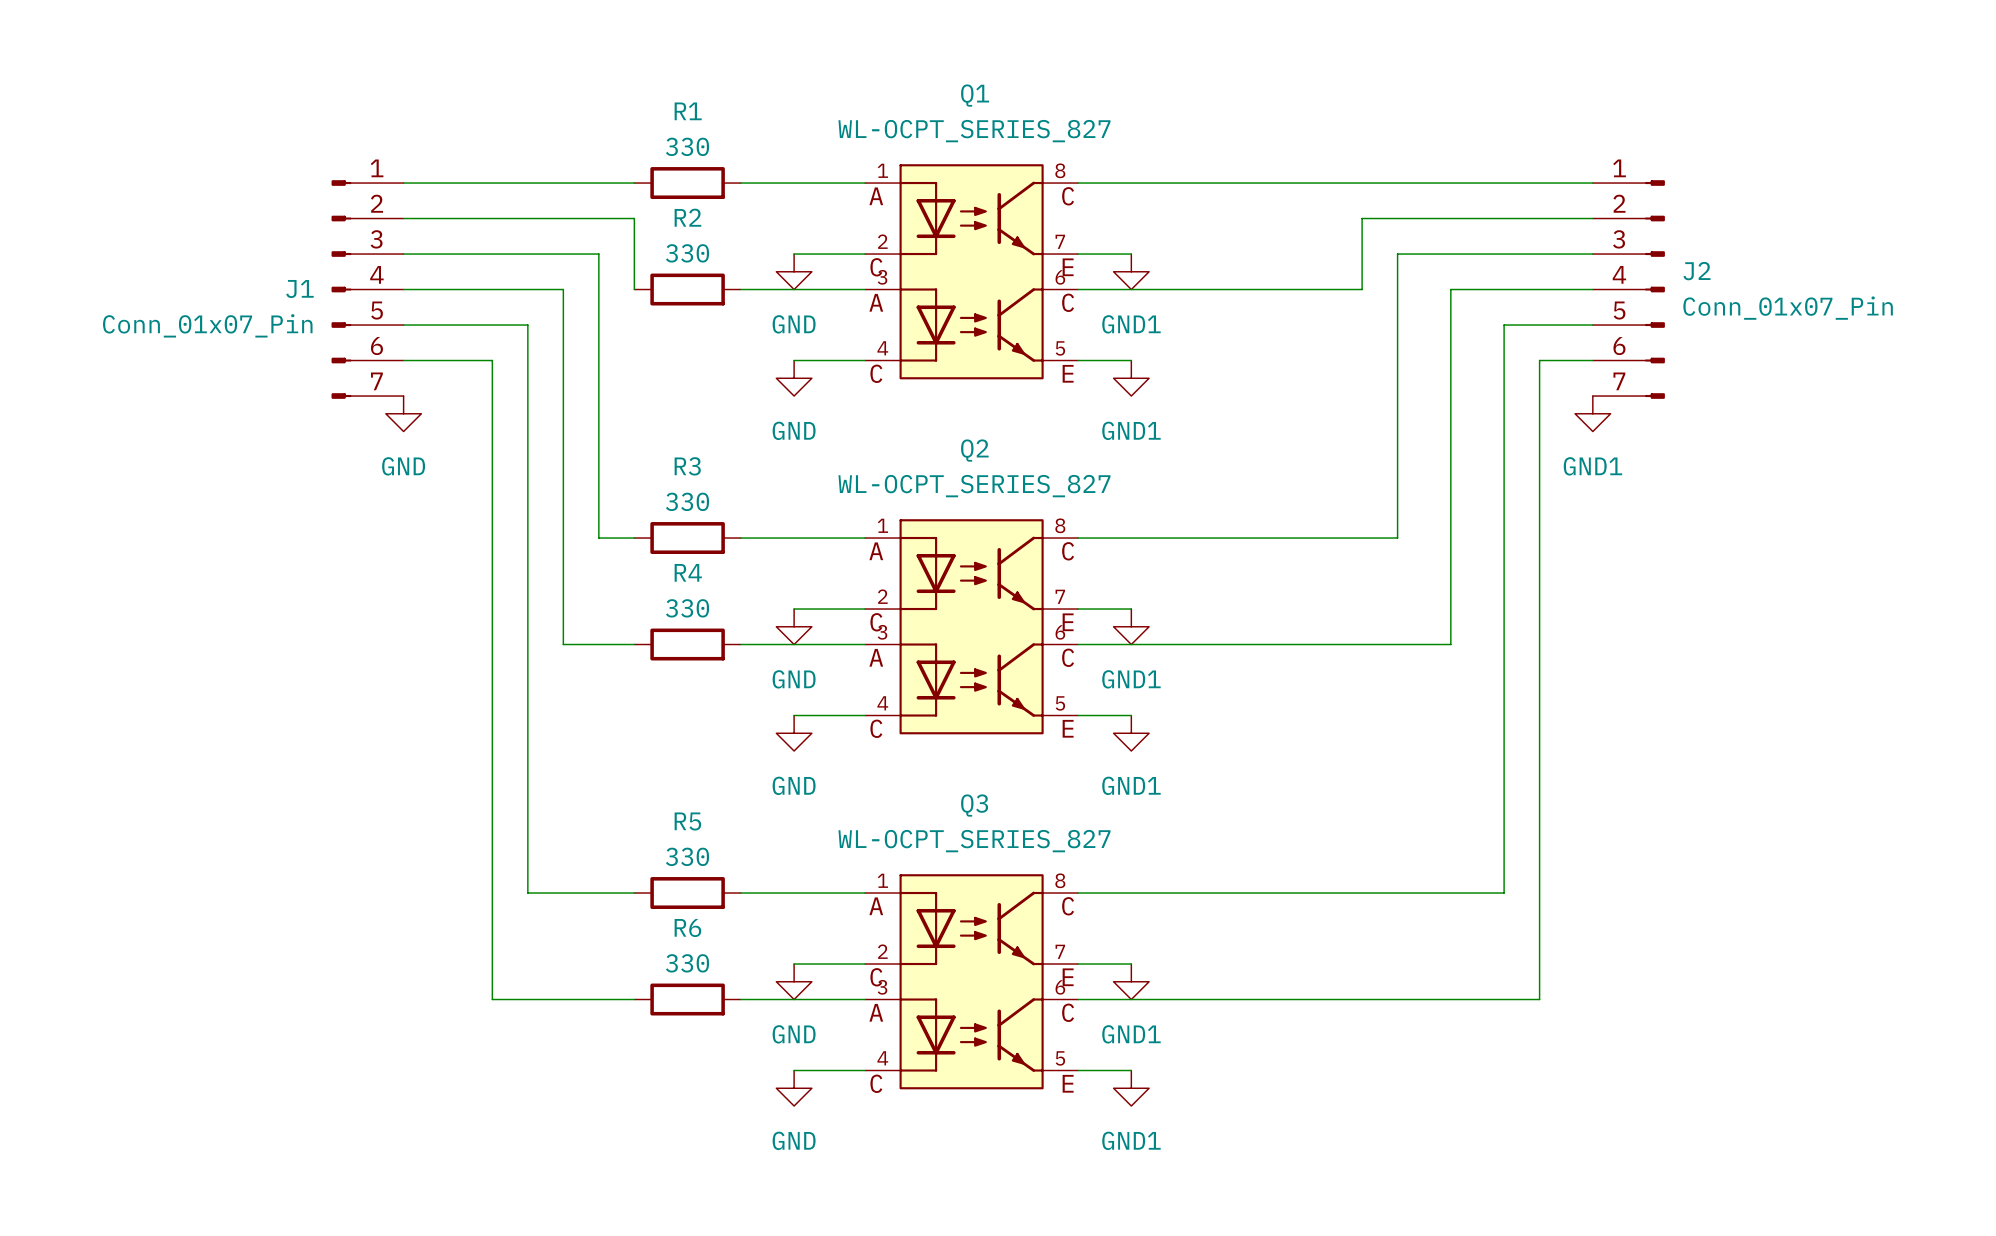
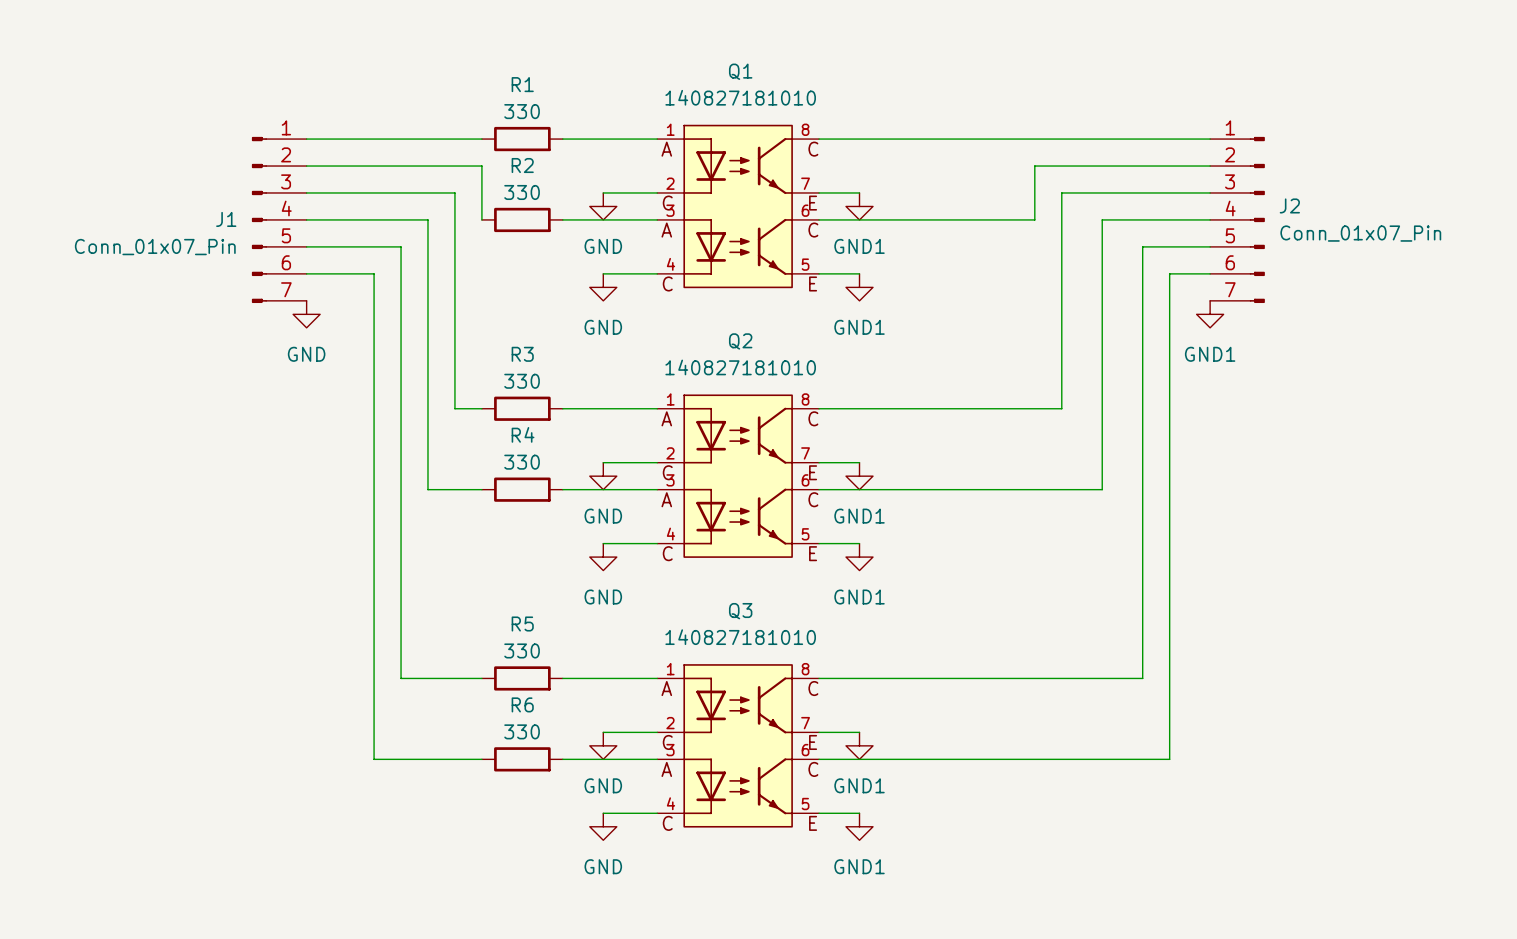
Q1 value: WL-OCPT_SERIES_827 (974, 131) -> 140827181010 (740, 97)
Q2 value: WL-OCPT_SERIES_827 (974, 486) -> 140827181010 (740, 367)
Q3 value: WL-OCPT_SERIES_827 (974, 841) -> 140827181010 (740, 637)

